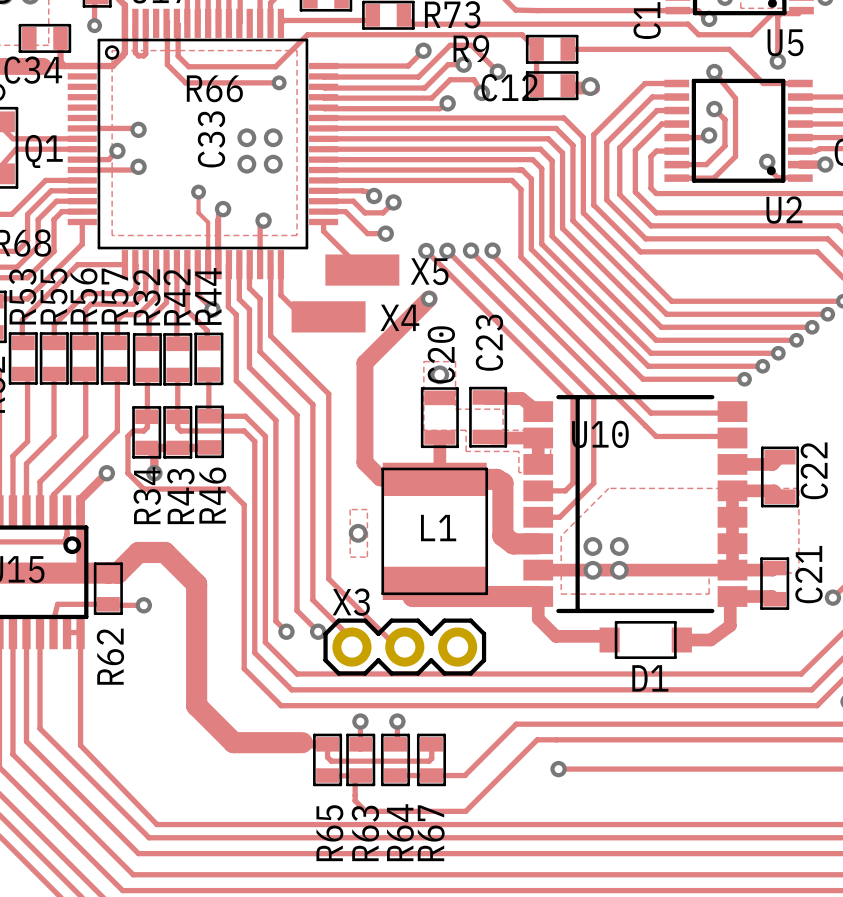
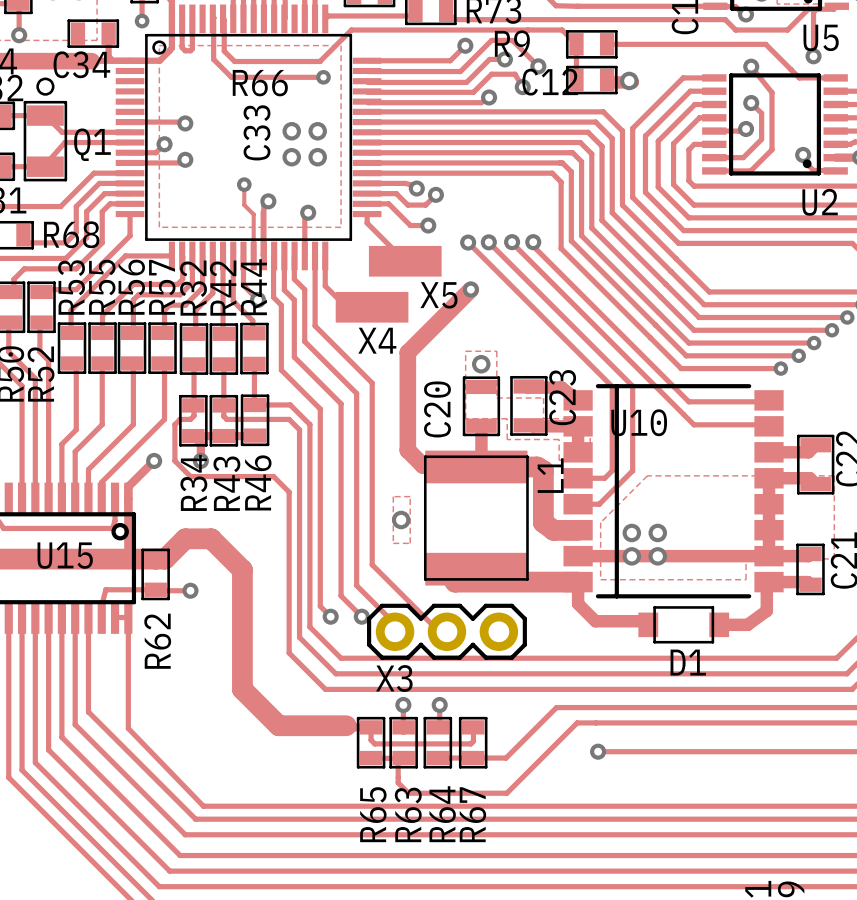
X5 name position: X5 (429, 271) -> X5 (438, 295)
X4 name position: X4 (399, 317) -> X4 (377, 340)
C23 name position: C23 (489, 342) -> C23 (562, 397)
C20 name position: C20 (441, 354) -> C20 (437, 409)
L1 name rotation: 0° (438, 528) -> 90° counterclockwise (550, 475)
L1 name position: L1 (438, 528) -> L1 (550, 475)
X3 name position: X3 (351, 602) -> X3 (394, 678)

